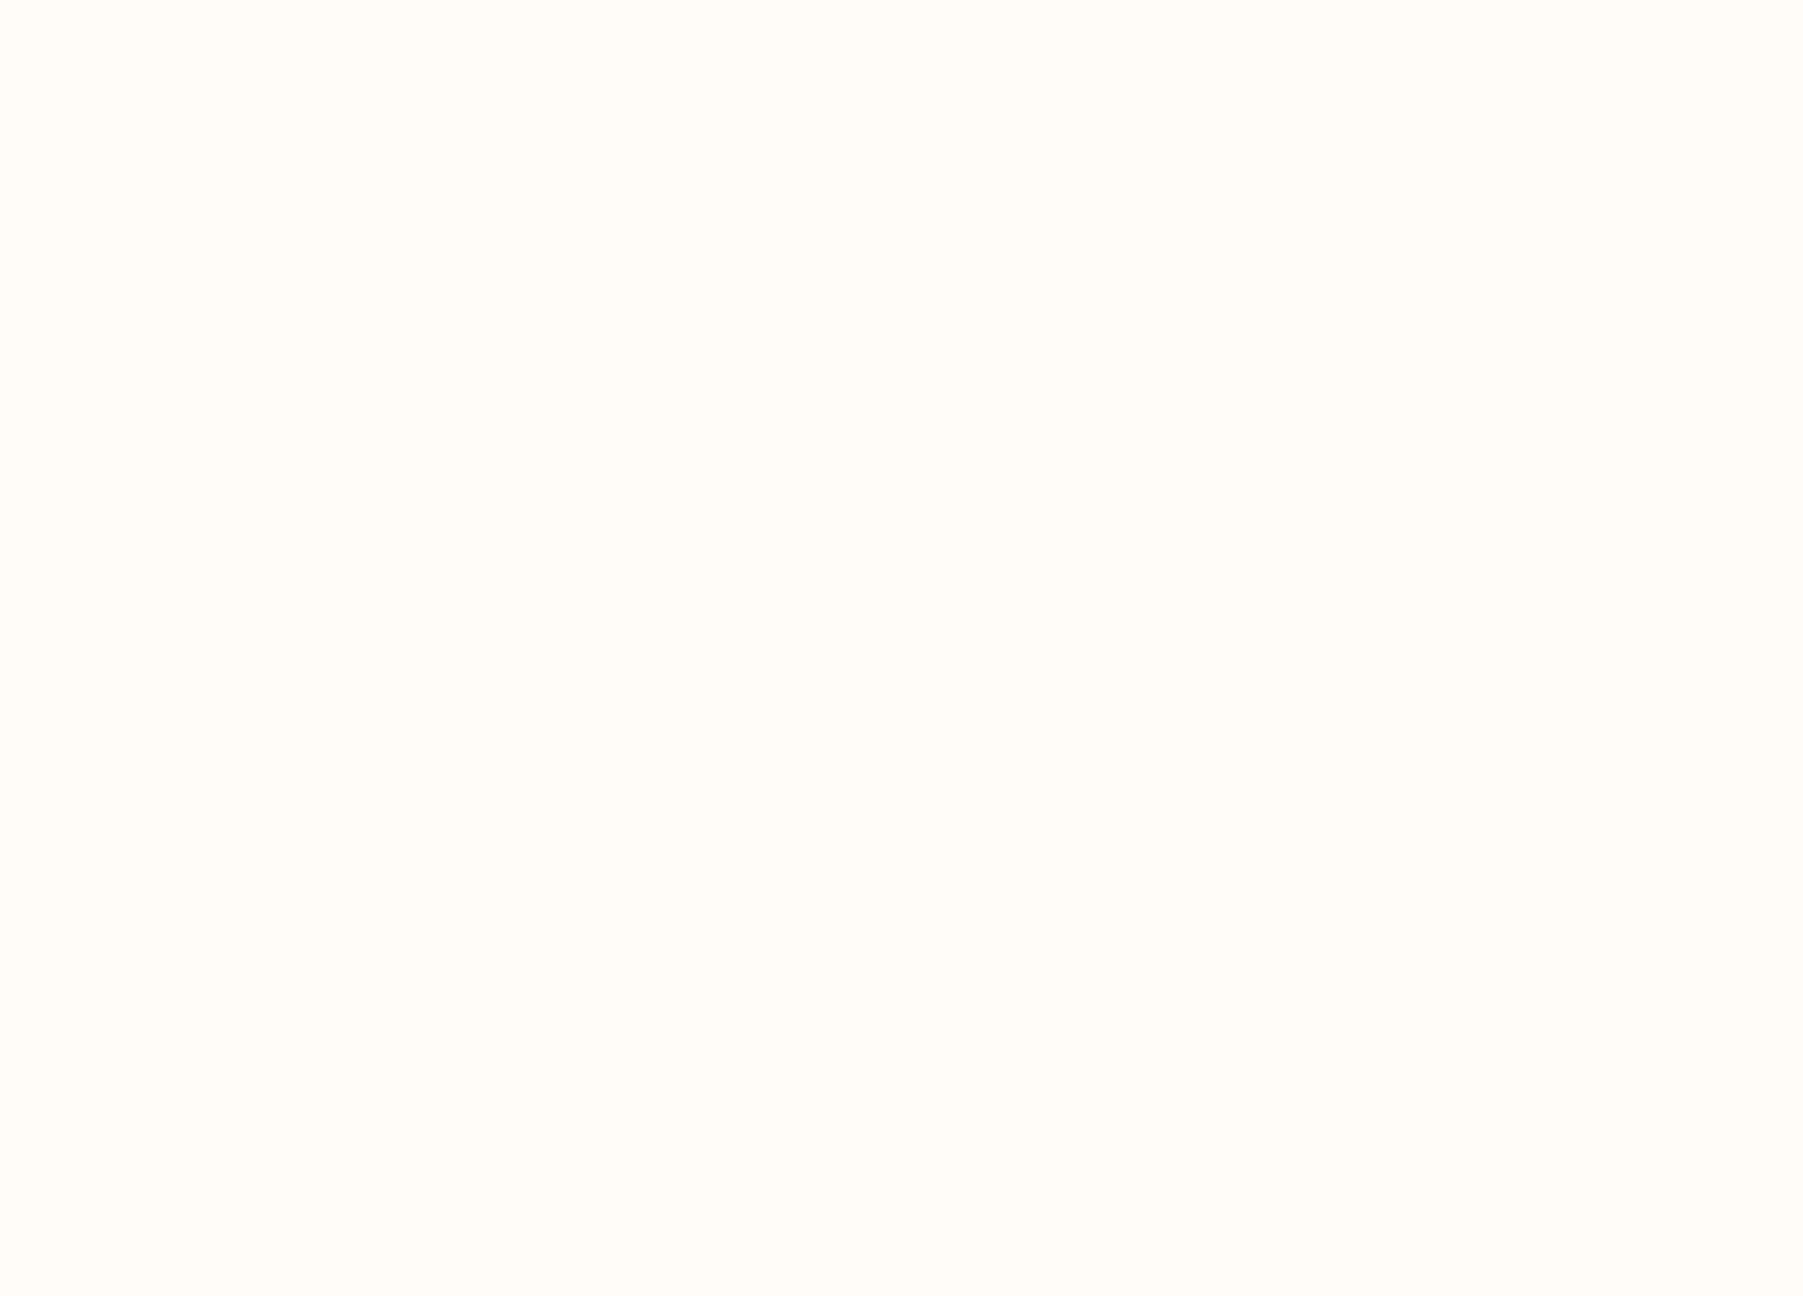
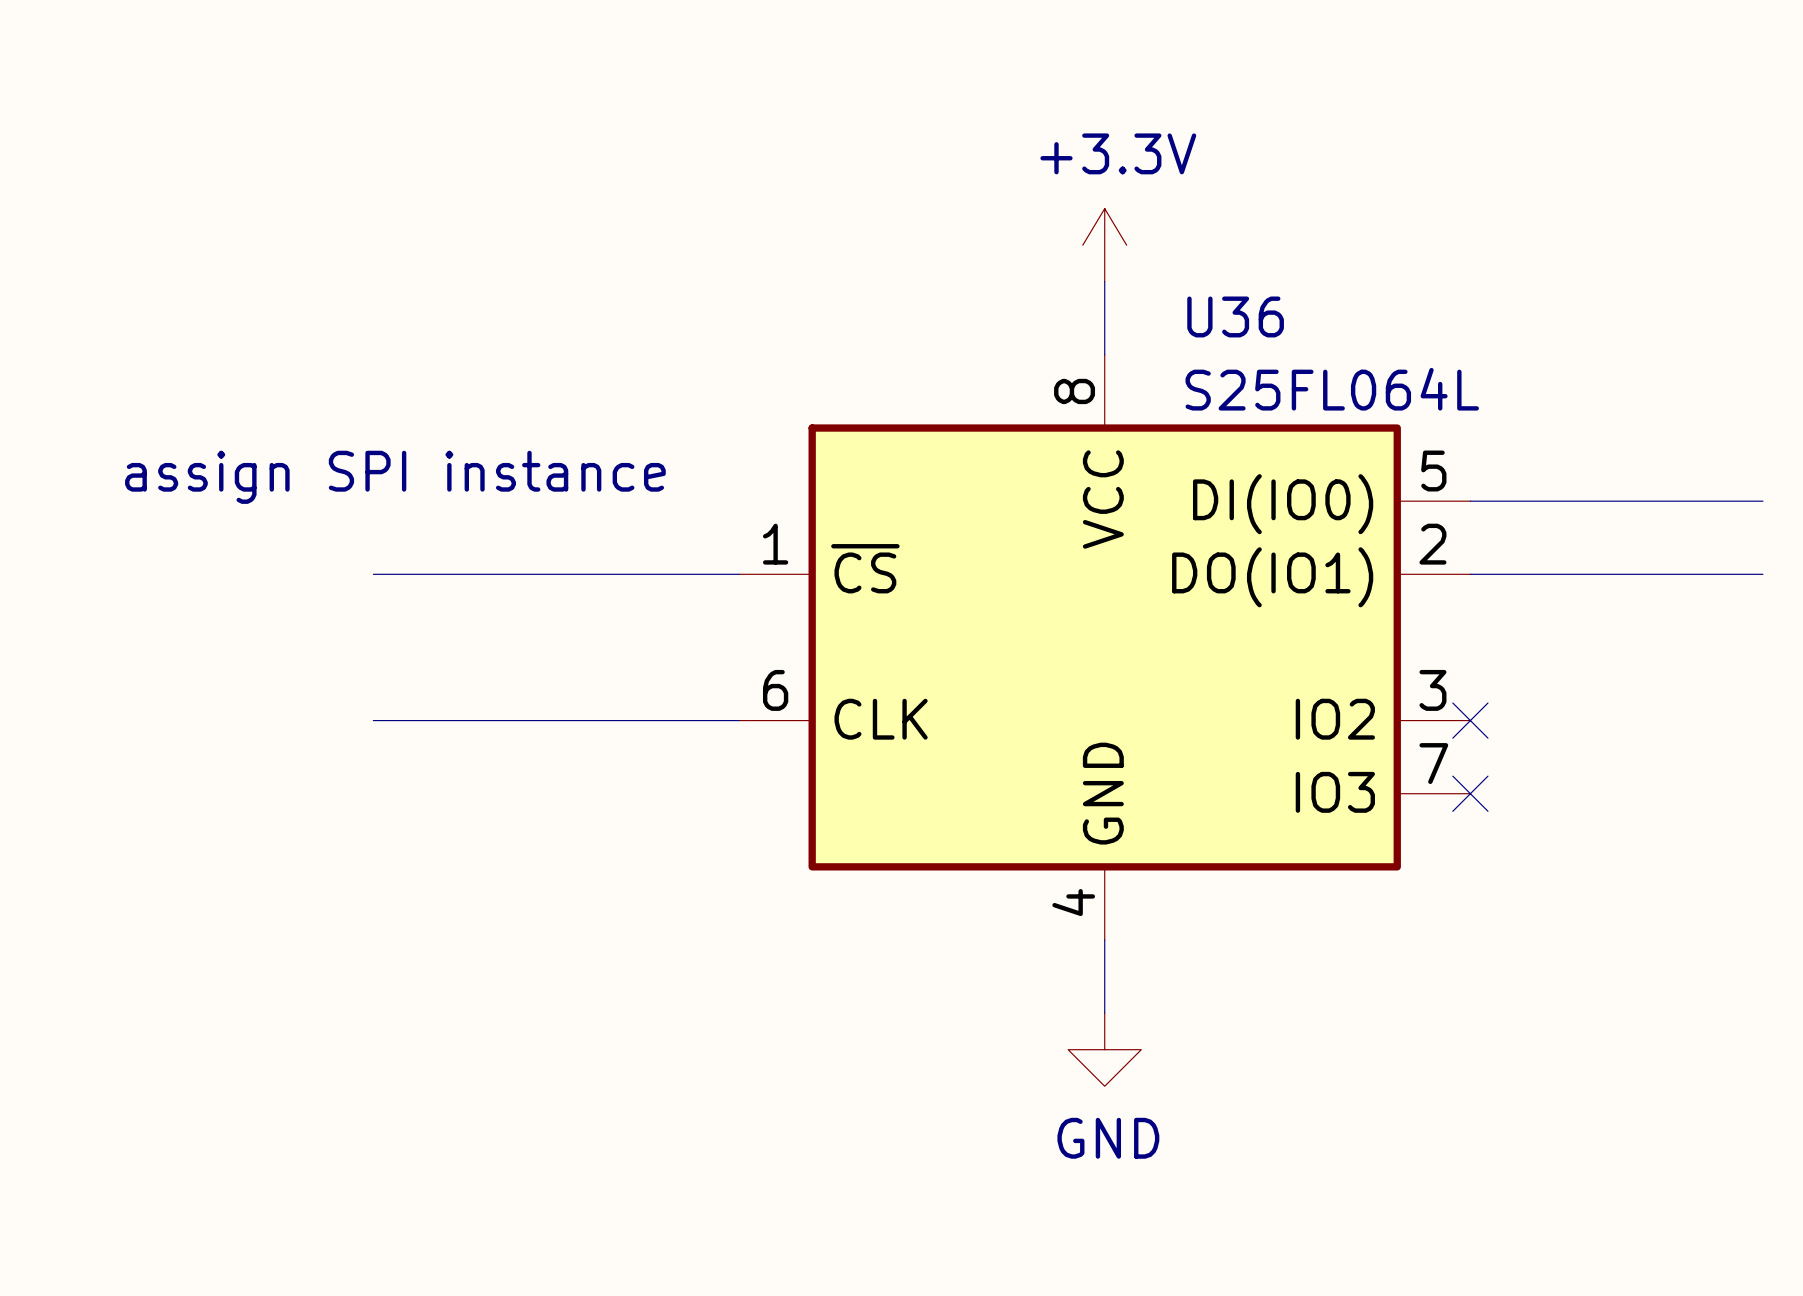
power symbol: none -> +3.3V (1104, 245)
wire: none -> (1104, 281) (1104, 354)
text: none -> assign SPI instance (395, 477)
wire: none -> (1470, 501) (1762, 501)
wire: none -> (373, 574) (739, 574)
wire: none -> (1470, 574) (1762, 574)
U36: none -> S25FL064L (1104, 647)
wire: none -> (373, 720) (739, 720)
no-connect mark: none -> (1470, 720)
no-connect mark: none -> (1470, 793)
wire: none -> (1104, 939) (1104, 1013)
power symbol: none -> GND (1104, 1049)

